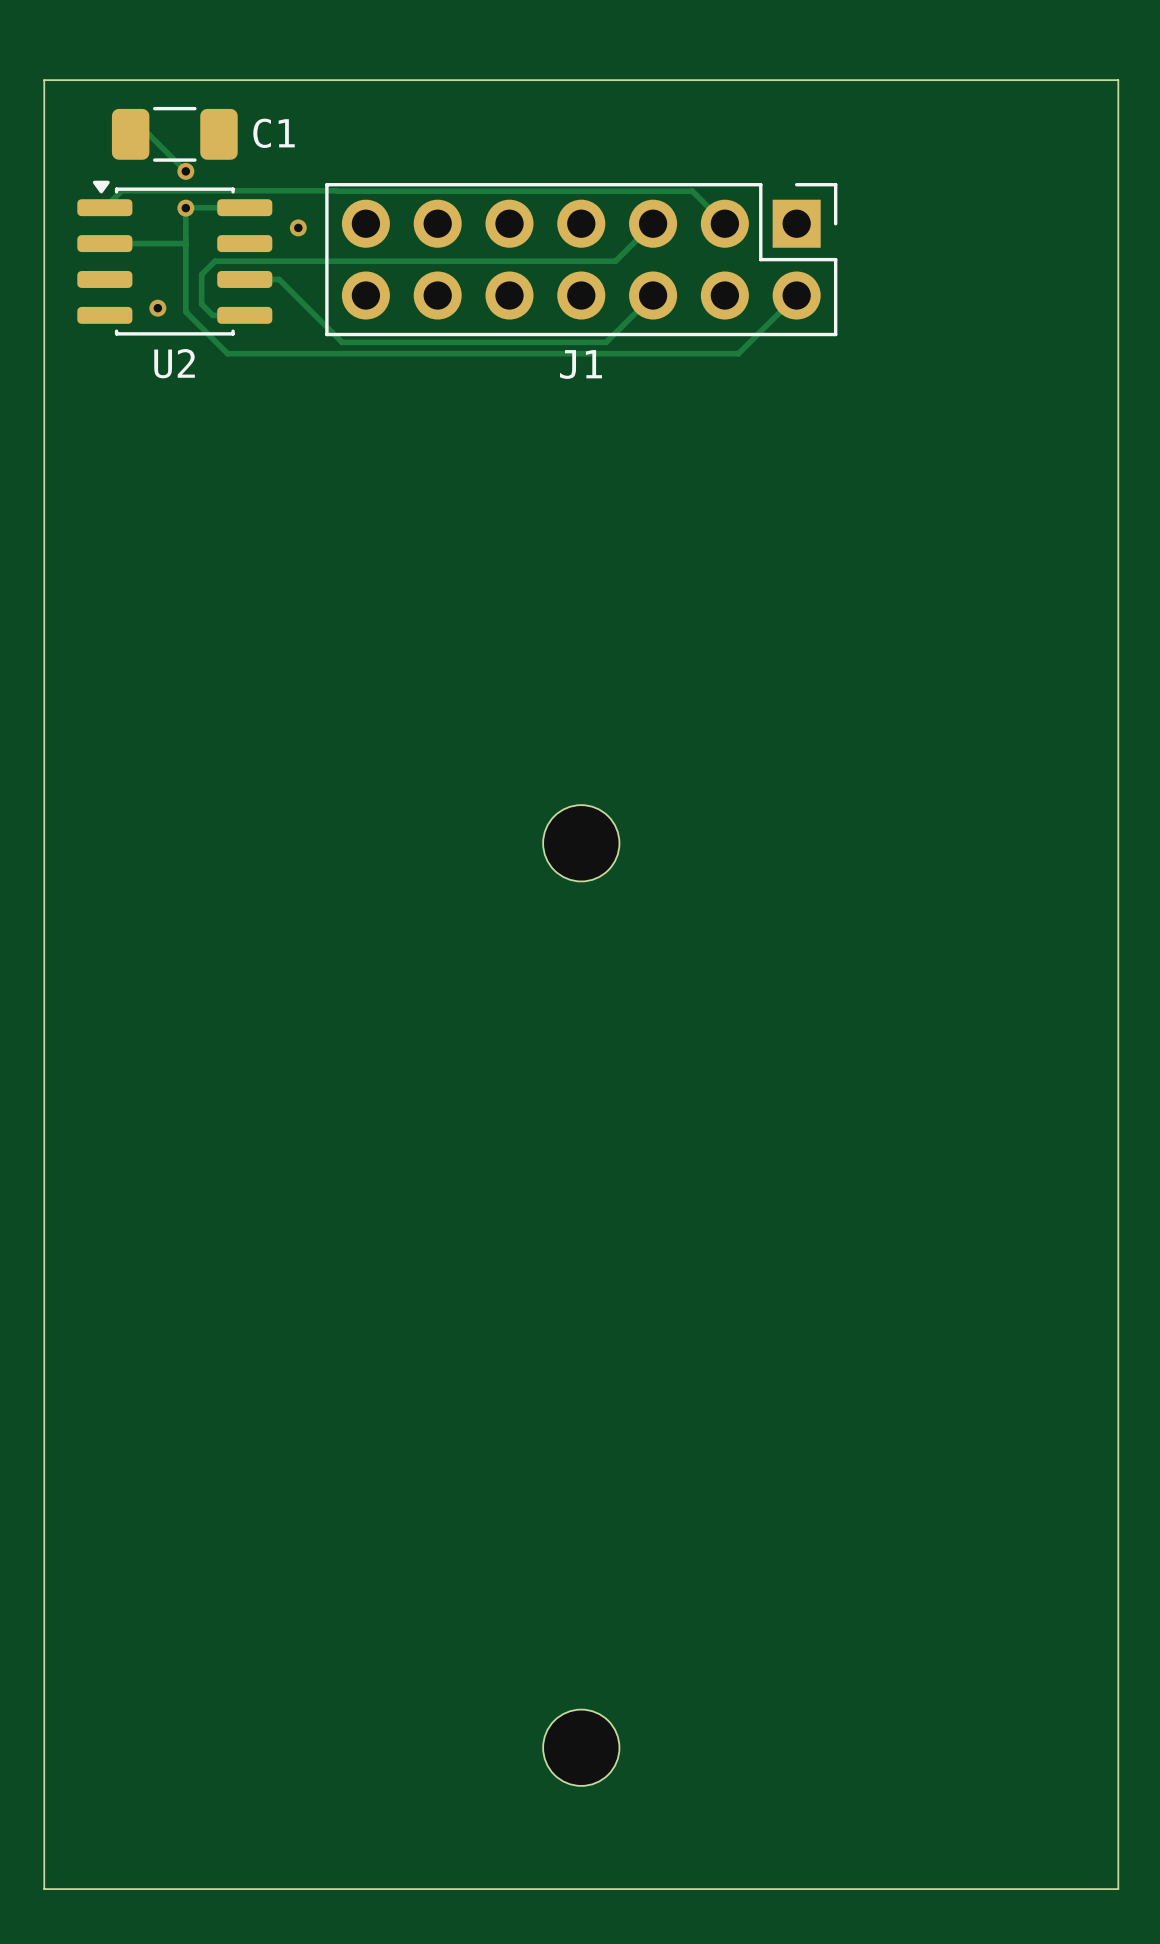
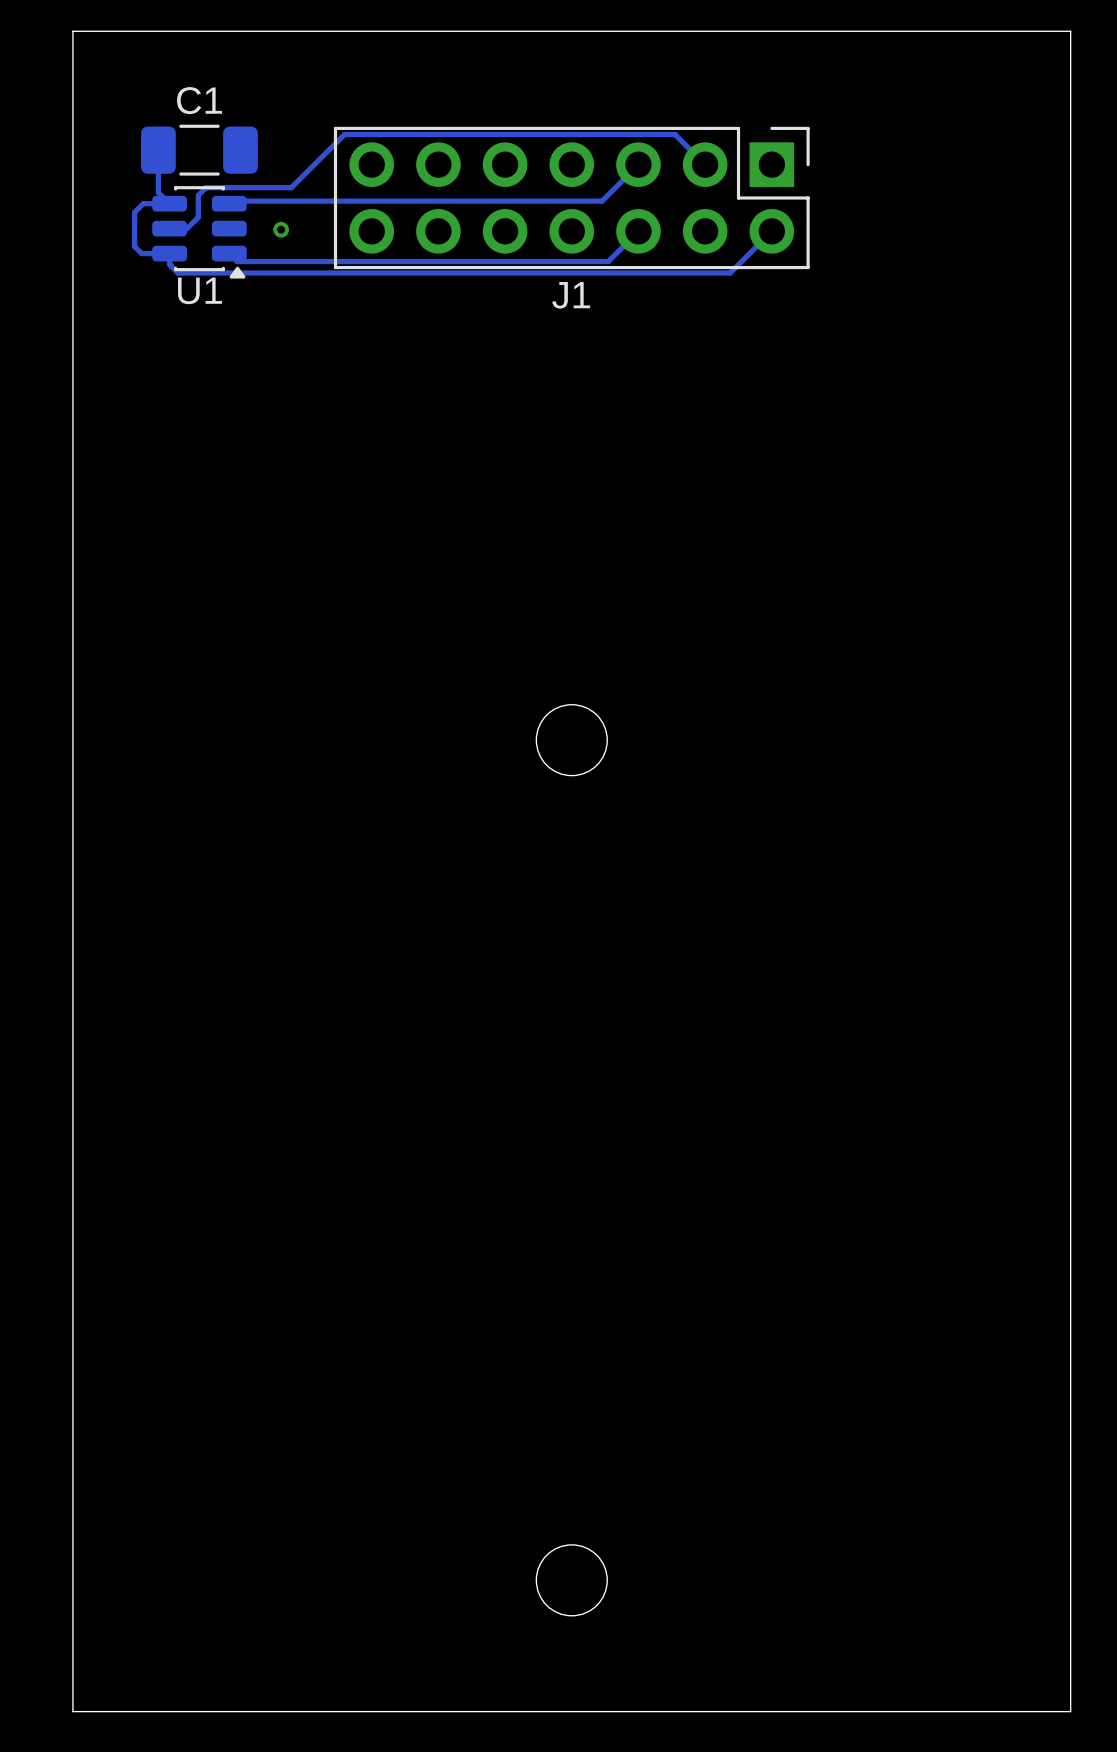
C1 name position: C1 (274, 133) -> C1 (199, 100)
track: (130, 134) (148, 134) (185, 171) -> none
C1 position: (174, 134) -> (199, 150)
via: (185, 171) -> none
track: (336, 191) (121, 190) (104, 207) -> (344, 134) (291, 187) (206, 187) (198, 195) (198, 217) (187, 228) (169, 228)
track: (244, 207) (185, 207) (185, 311) (227, 353) (738, 353) (751, 340) -> (171, 266) (177, 273) (730, 273)
track: none -> (158, 150) (158, 192) (169, 203) (143, 203) (134, 212) (134, 246) (141, 253) (169, 253) (171, 265)
via: (185, 208) -> none
via: (298, 227) -> none
track: (104, 243) (185, 244) -> none
U2: (174, 258) -> none
track: (615, 261) (214, 261) (201, 274) (201, 304) (212, 315) (244, 315) -> (603, 199) (601, 201) (231, 201) (229, 203)
track: (244, 279) (279, 279) (342, 342) (606, 342) (620, 328) -> (229, 253) (237, 261) (608, 261)
via: none -> (281, 229)
U1: none -> (199, 232)
via: (157, 308) -> none

